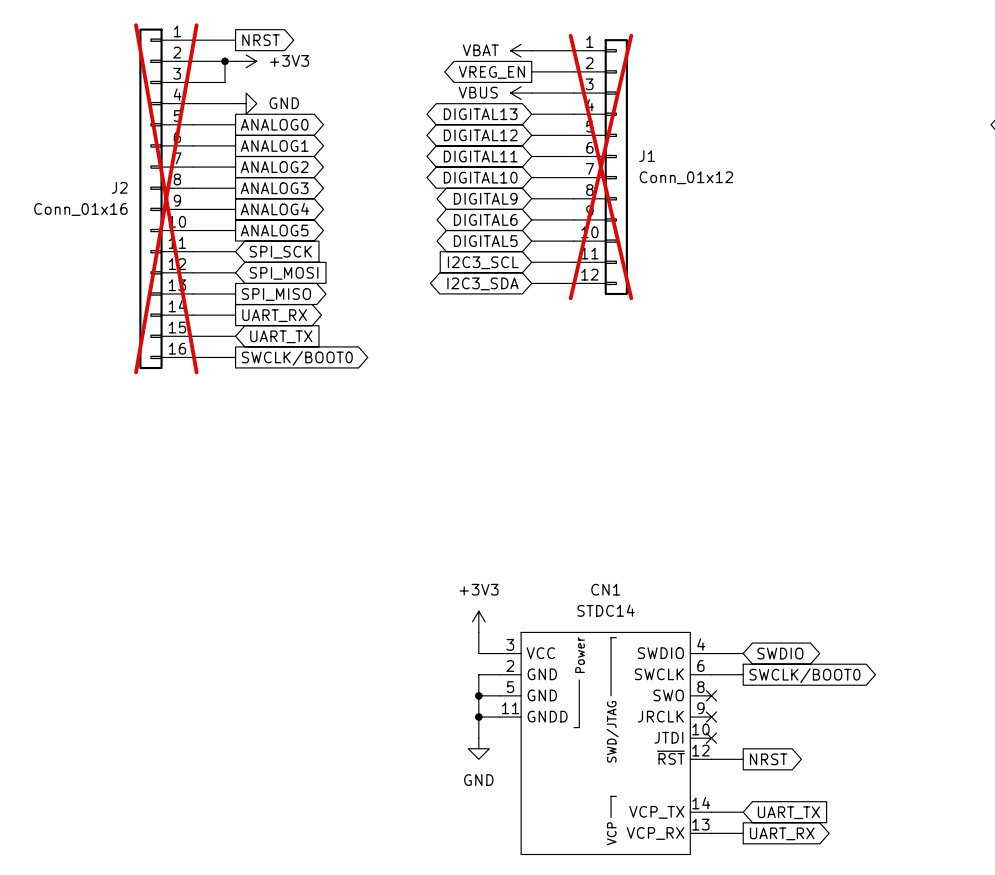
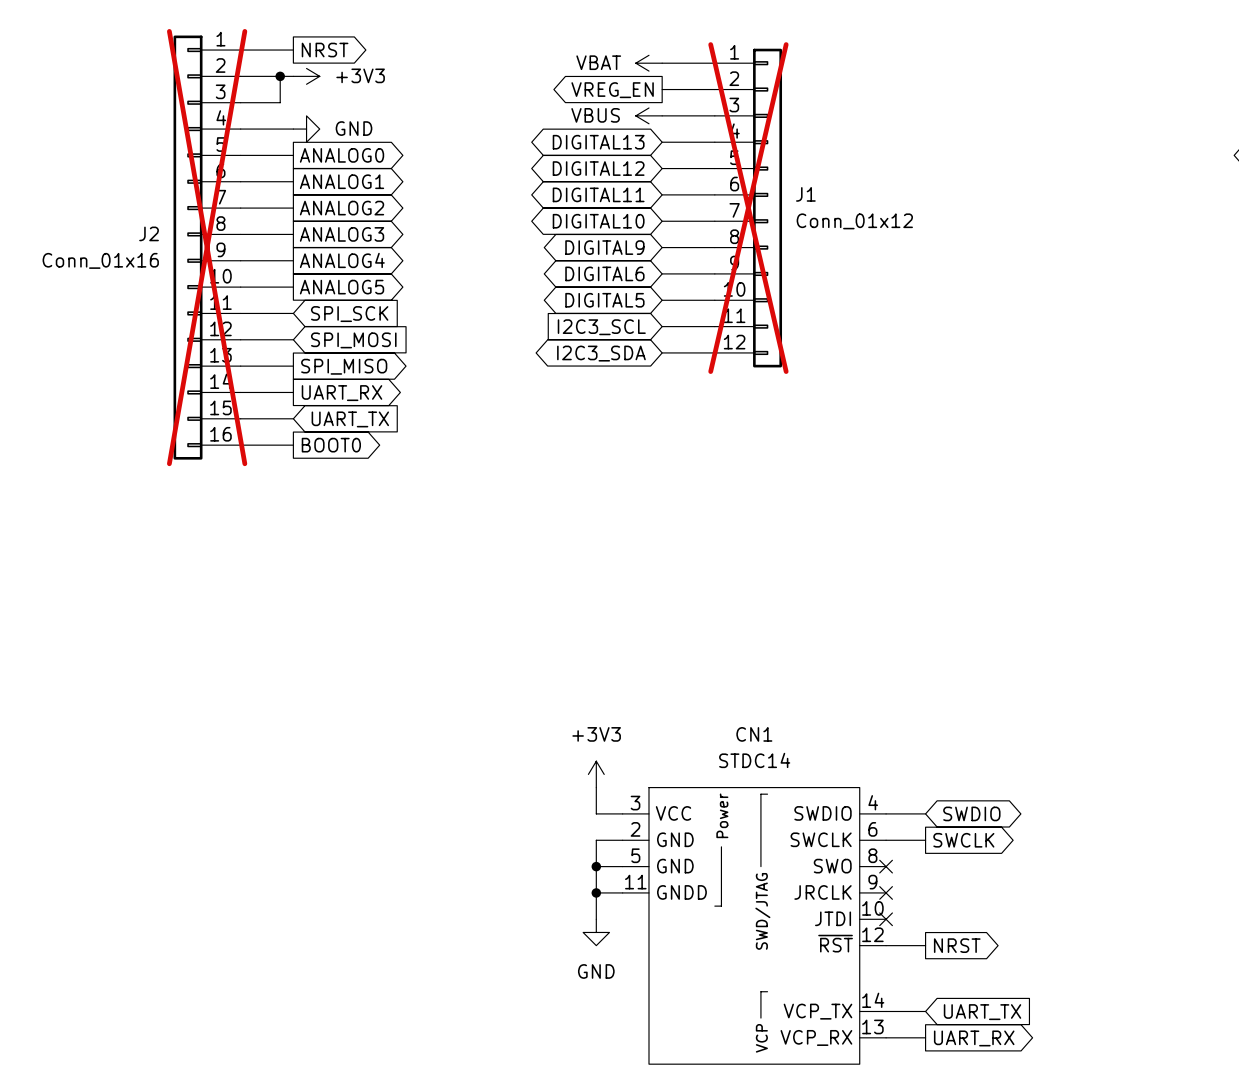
global label: SWCLK/BOOT0 (297, 358) -> BOOT0 (331, 445)
global label: SWCLK/BOOT0 (804, 675) -> SWCLK (963, 840)

